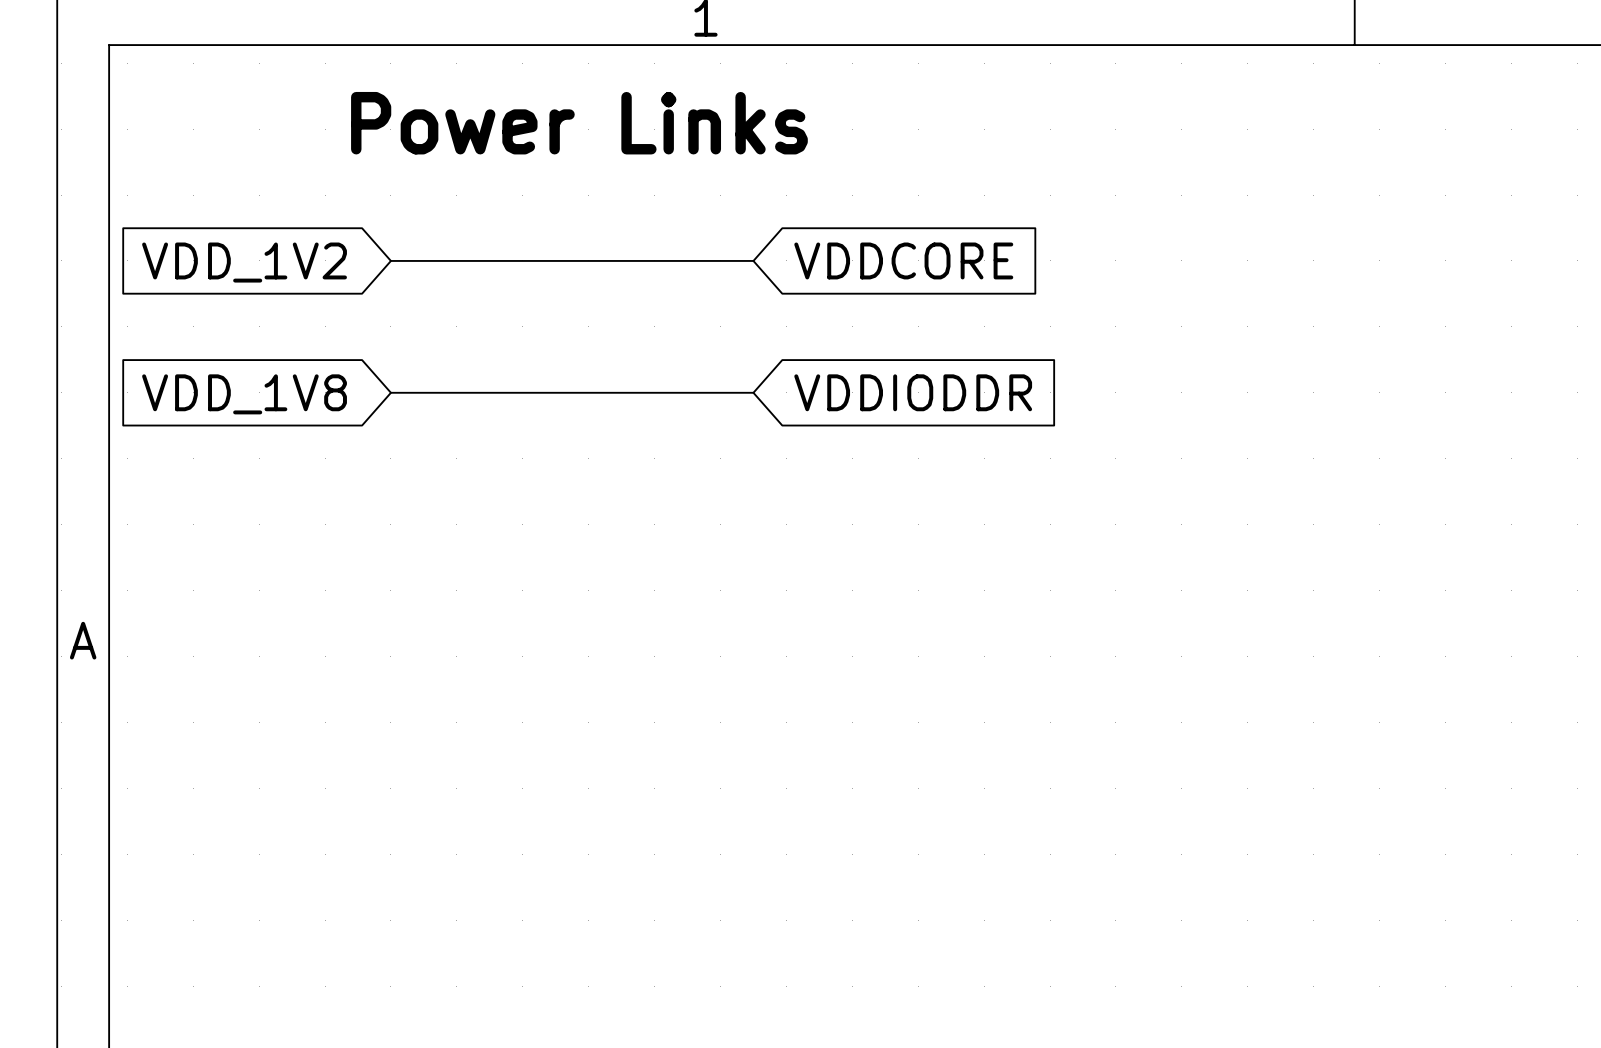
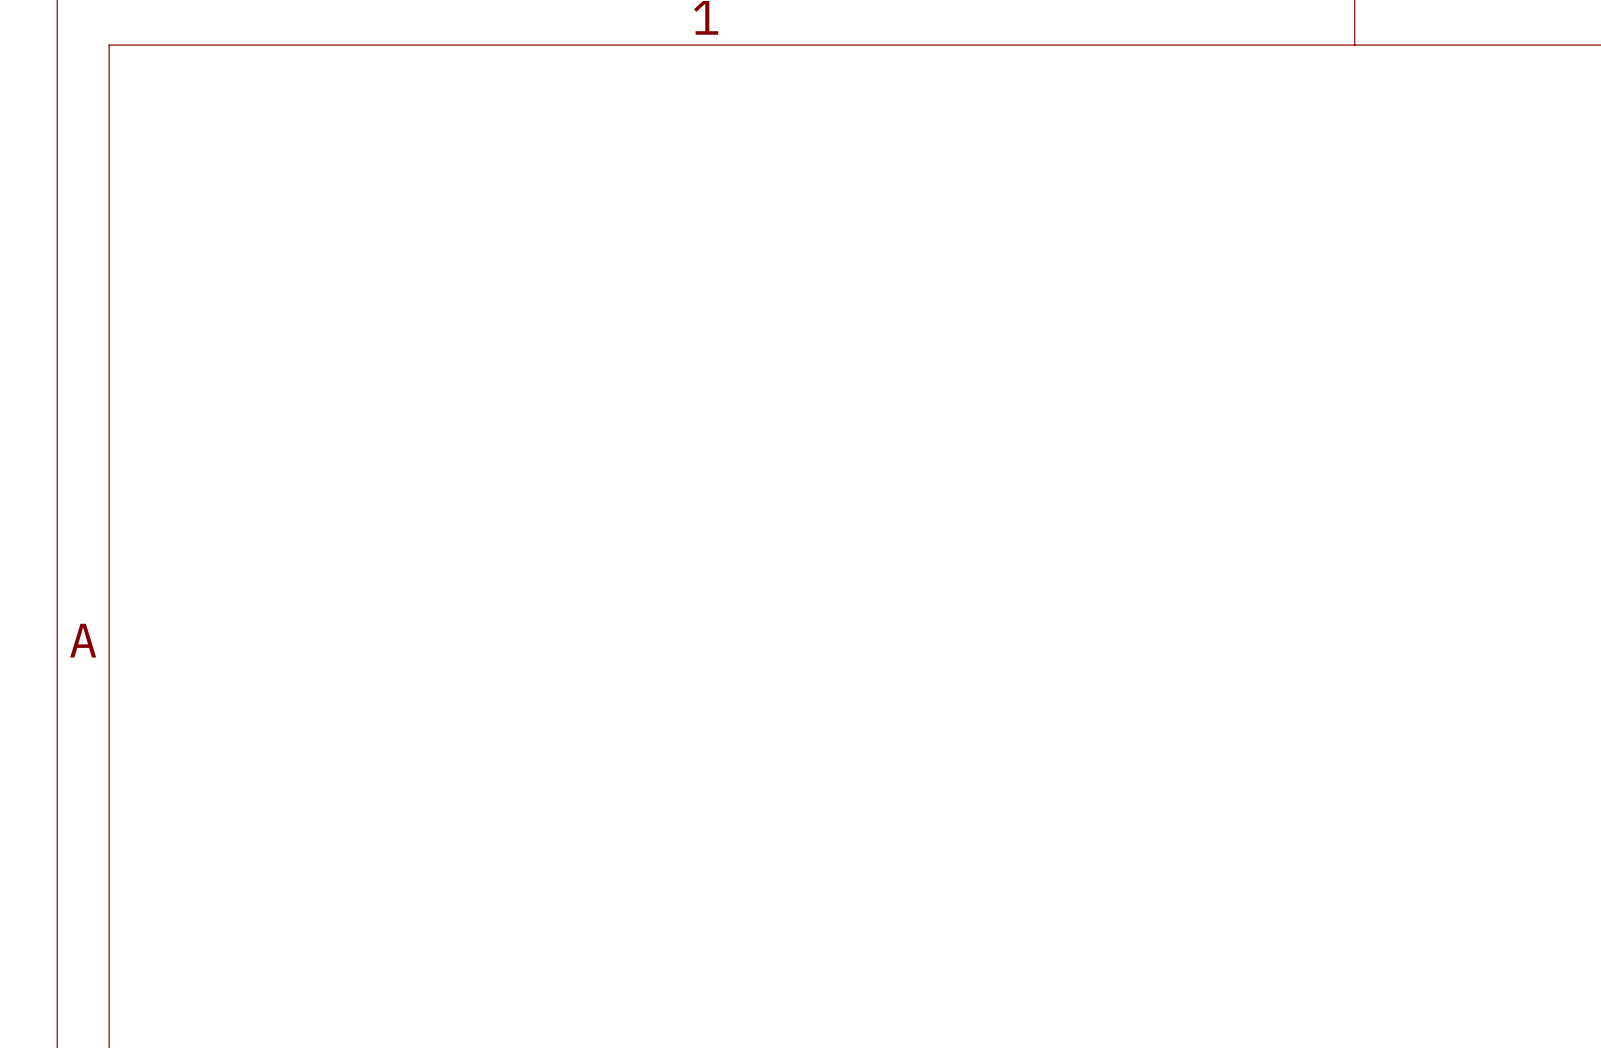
text: Power Links (579, 123) -> none
wire: (390, 260) (753, 260) -> none
global label: VDDCORE (903, 260) -> none
global label: VDD_1V2 (244, 262) -> none
wire: (390, 392) (753, 392) -> none
global label: VDDIODDR (913, 392) -> none
global label: VDD_1V8 (244, 394) -> none

